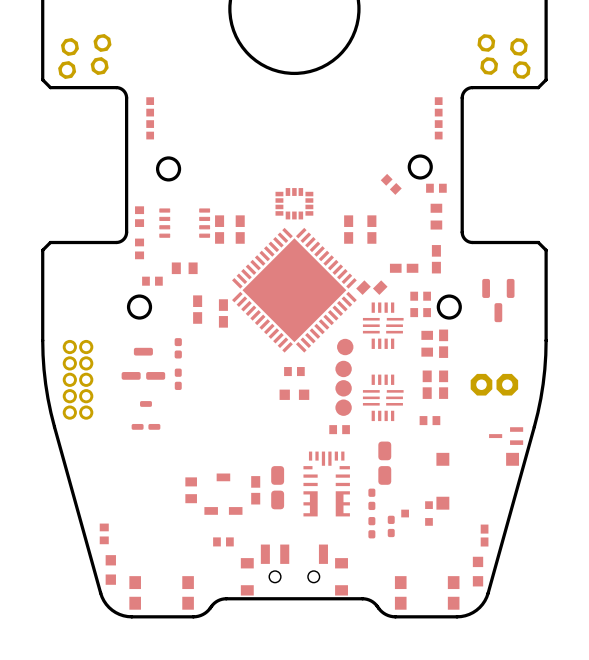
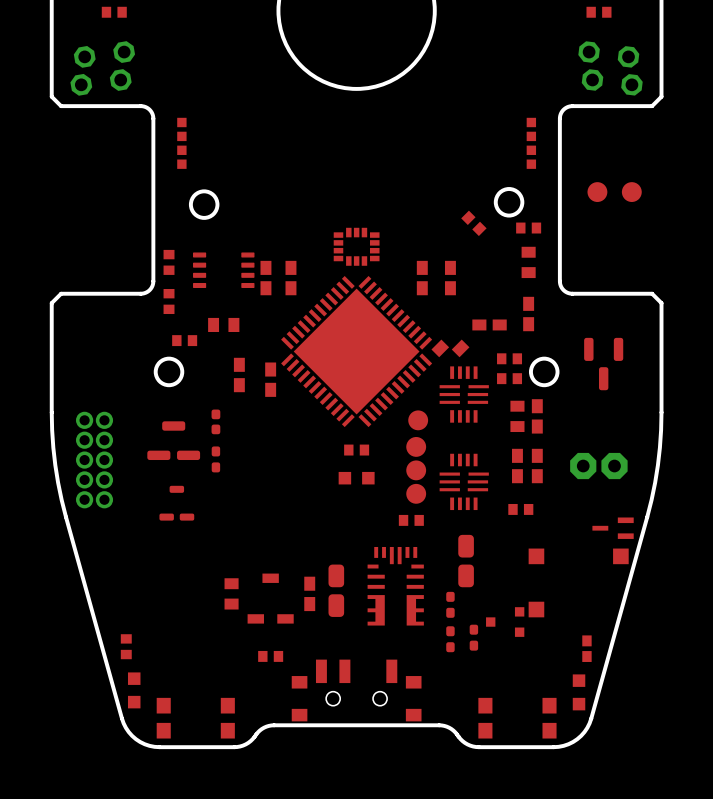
part: none -> (114, 12)
part: none -> (598, 12)
part: none -> (614, 192)

